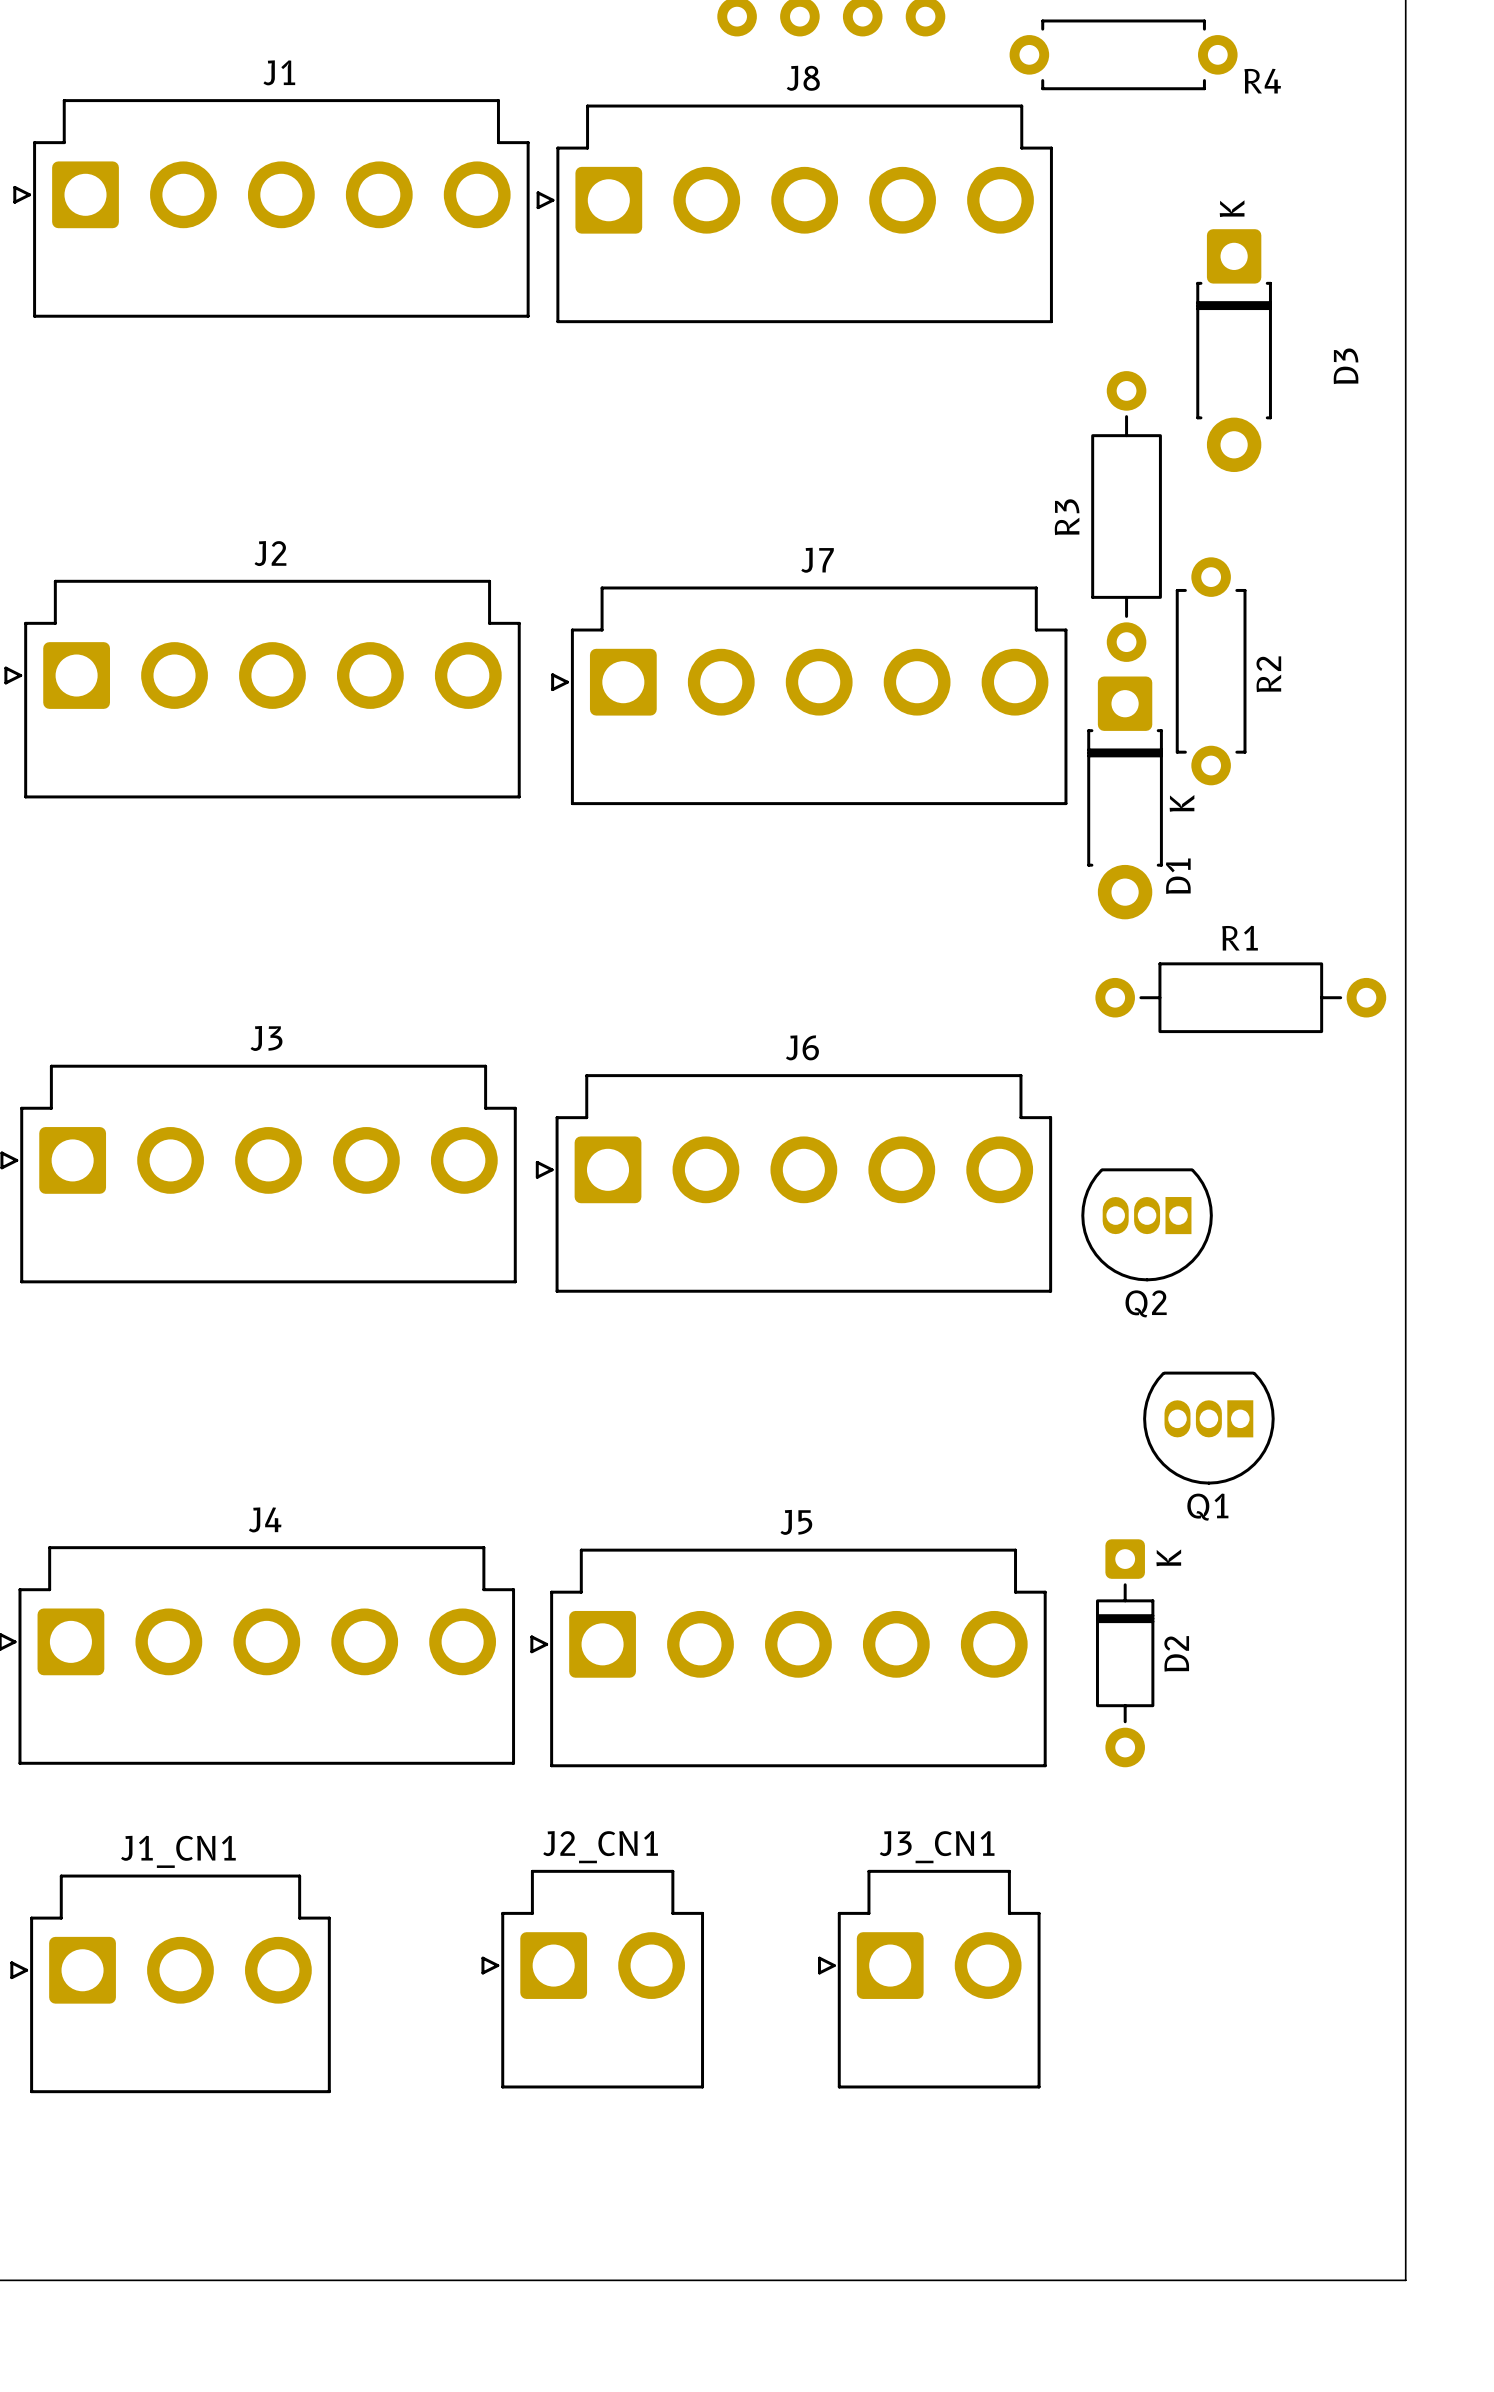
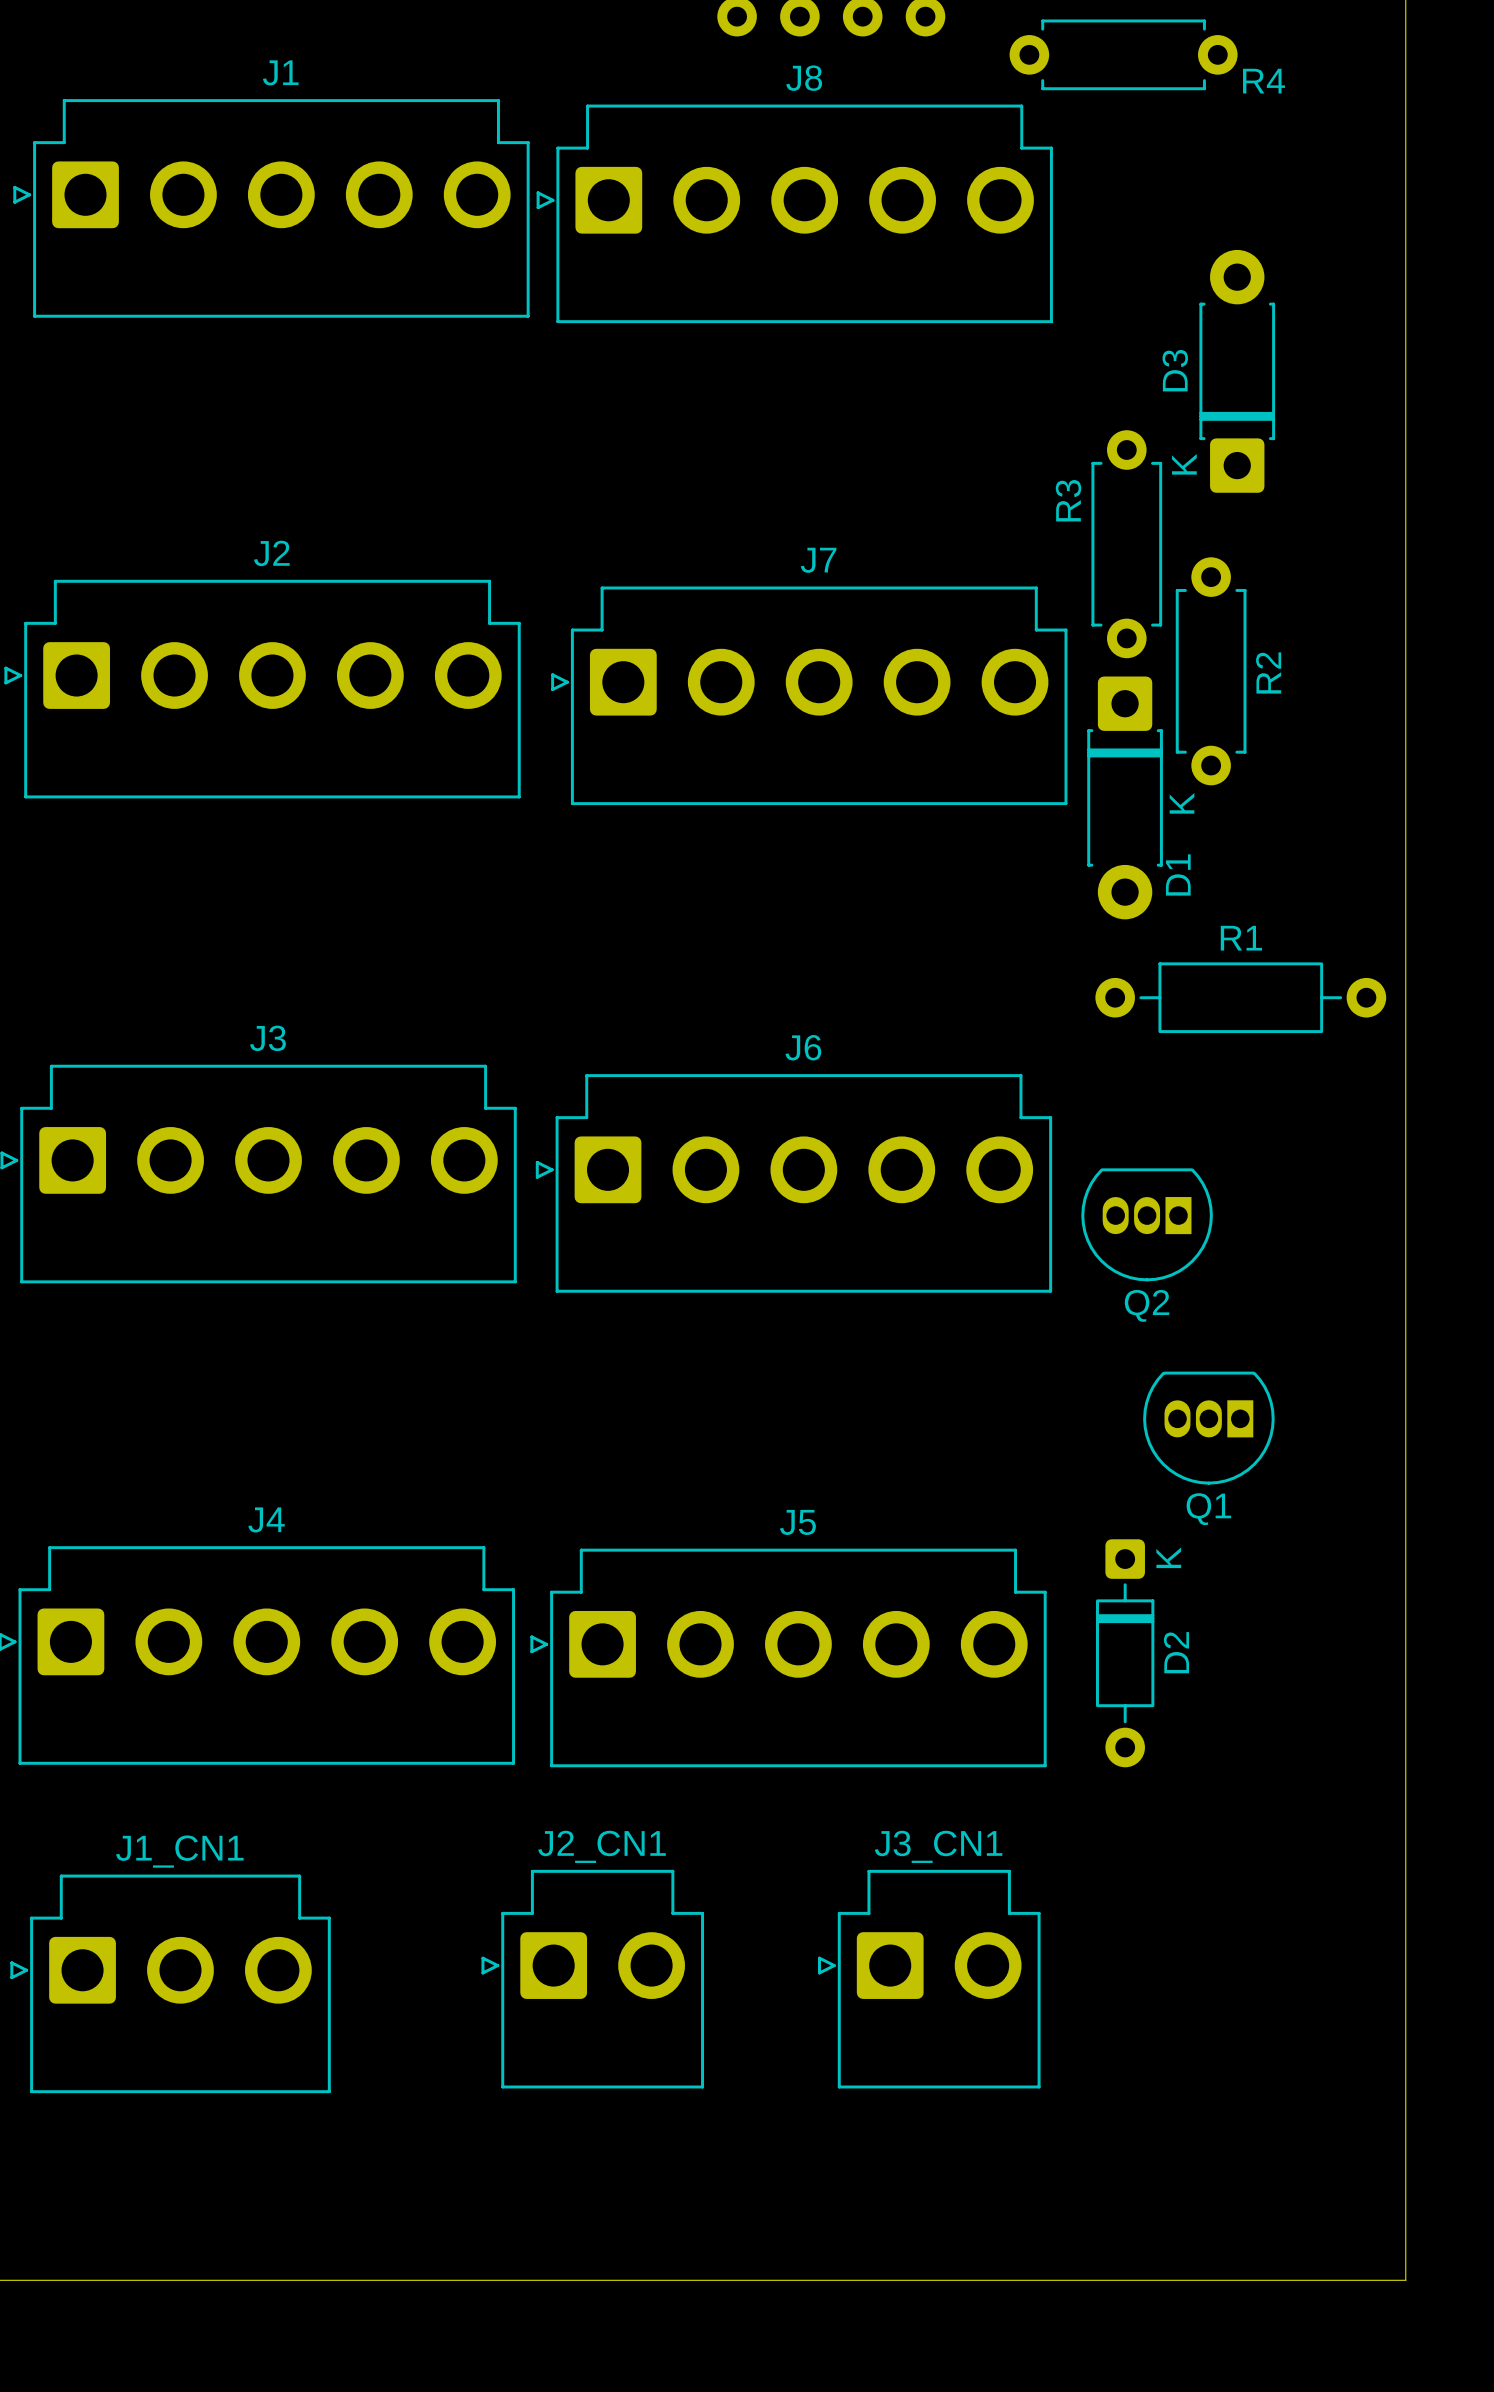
D3 footprint: [1196, 229, 1272, 473] -> [1199, 249, 1276, 493]
D3 name position: D3 (1346, 366) -> D3 (1175, 370)
R3 footprint: [1091, 371, 1162, 662] -> [1091, 430, 1163, 659]

